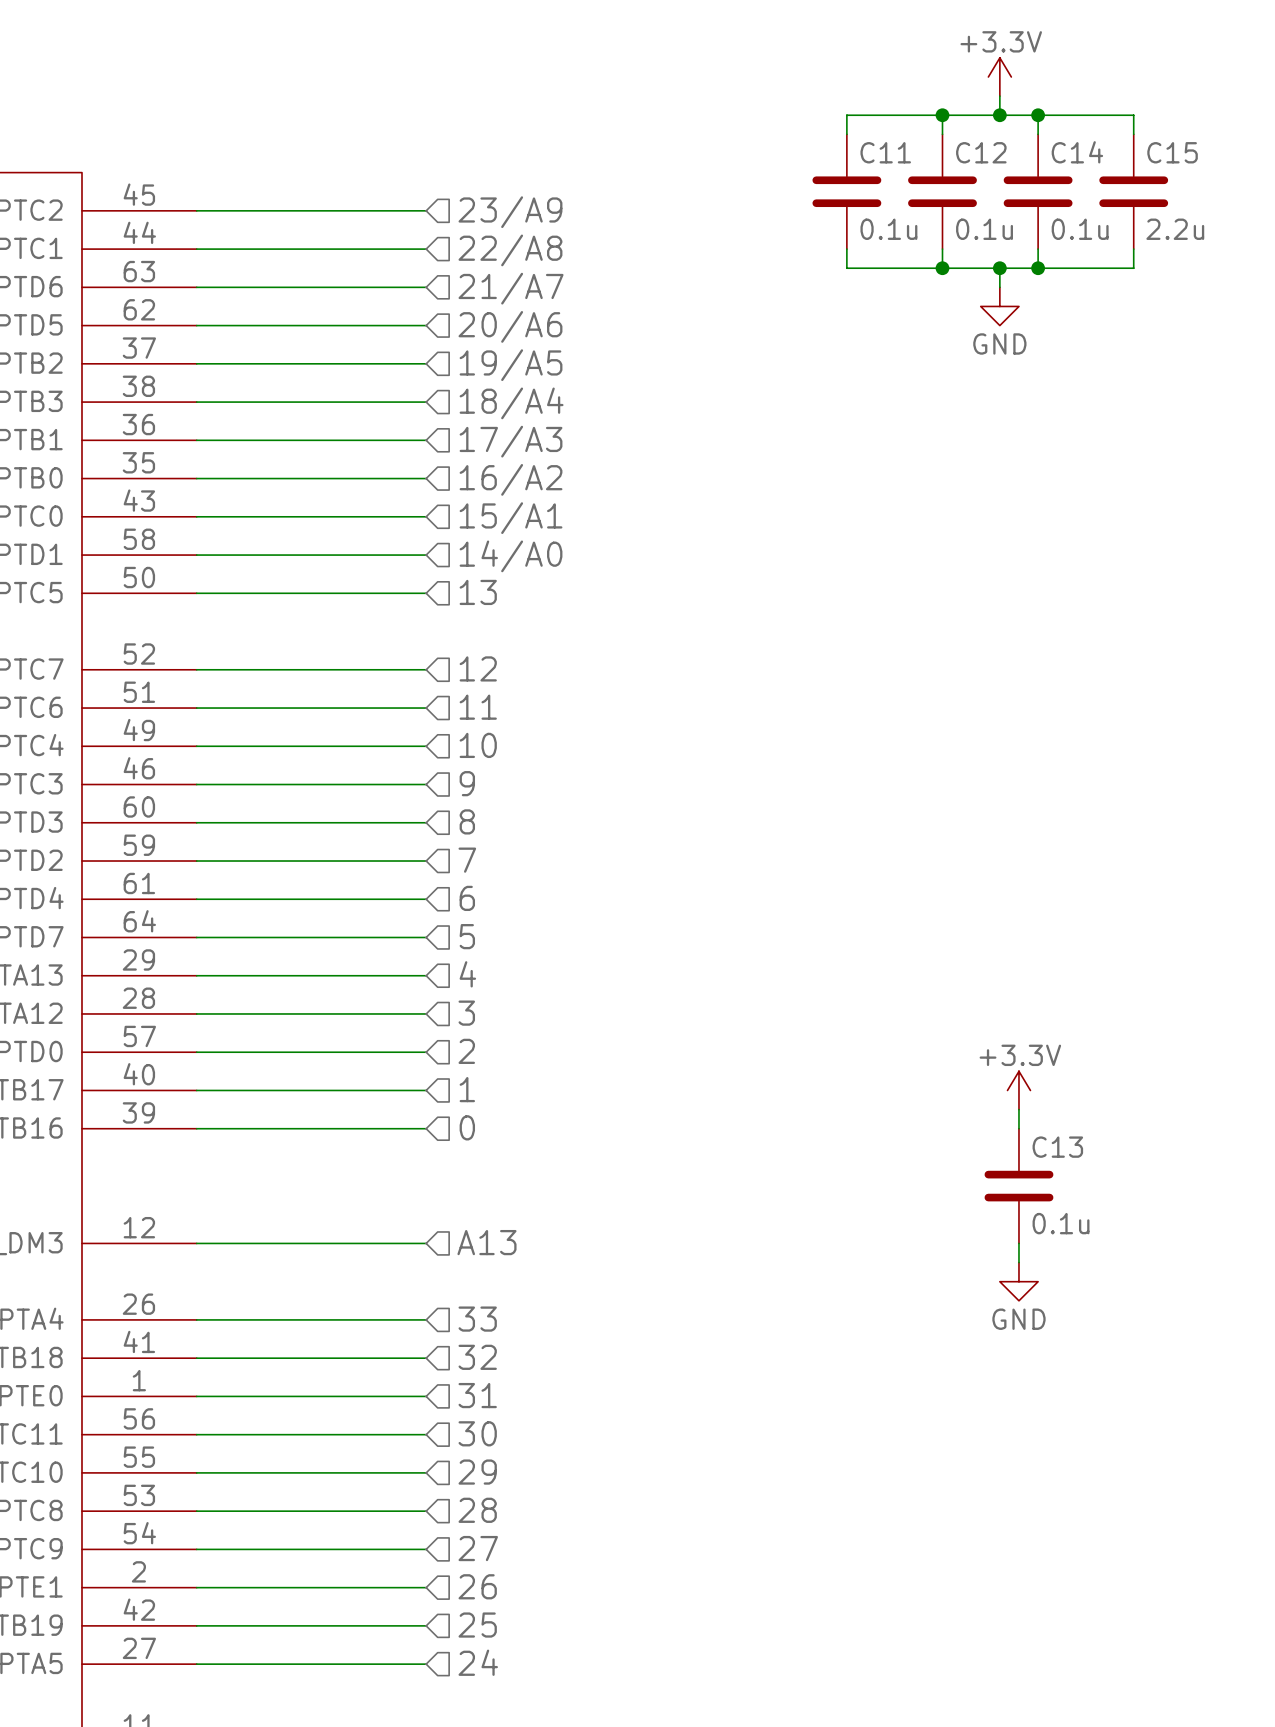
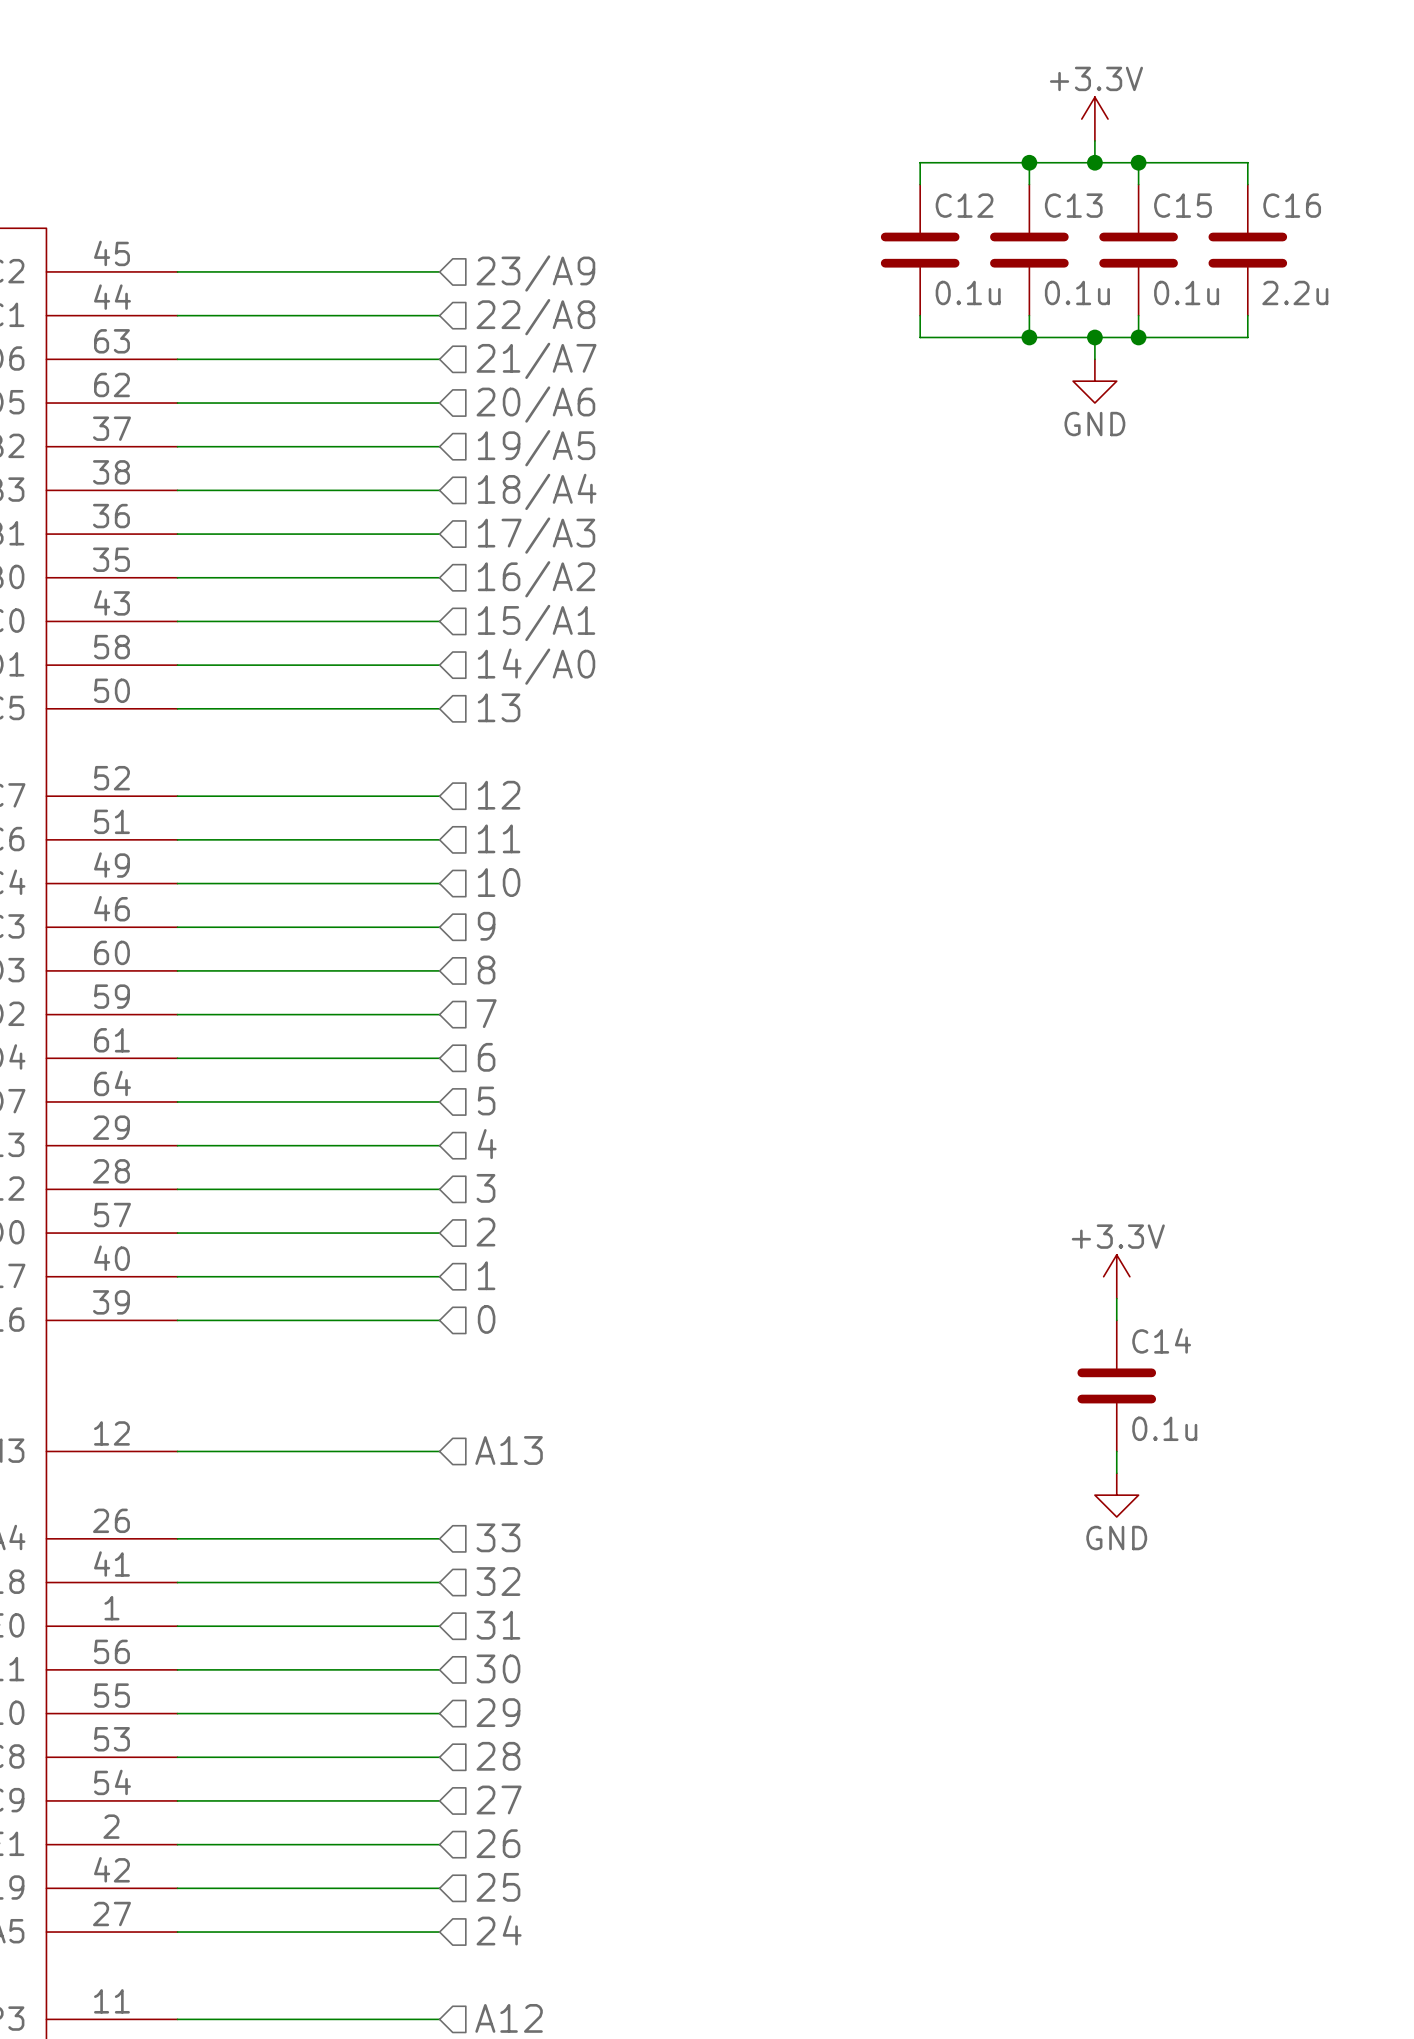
C11 name: C11 (885, 152) -> C12 (964, 205)
C12 name: C12 (981, 152) -> C13 (1073, 205)
C14 name: C14 (1077, 152) -> C15 (1182, 205)
C15 name: C15 (1172, 152) -> C16 (1292, 205)
C13 name: C13 (1057, 1147) -> C14 (1161, 1340)

